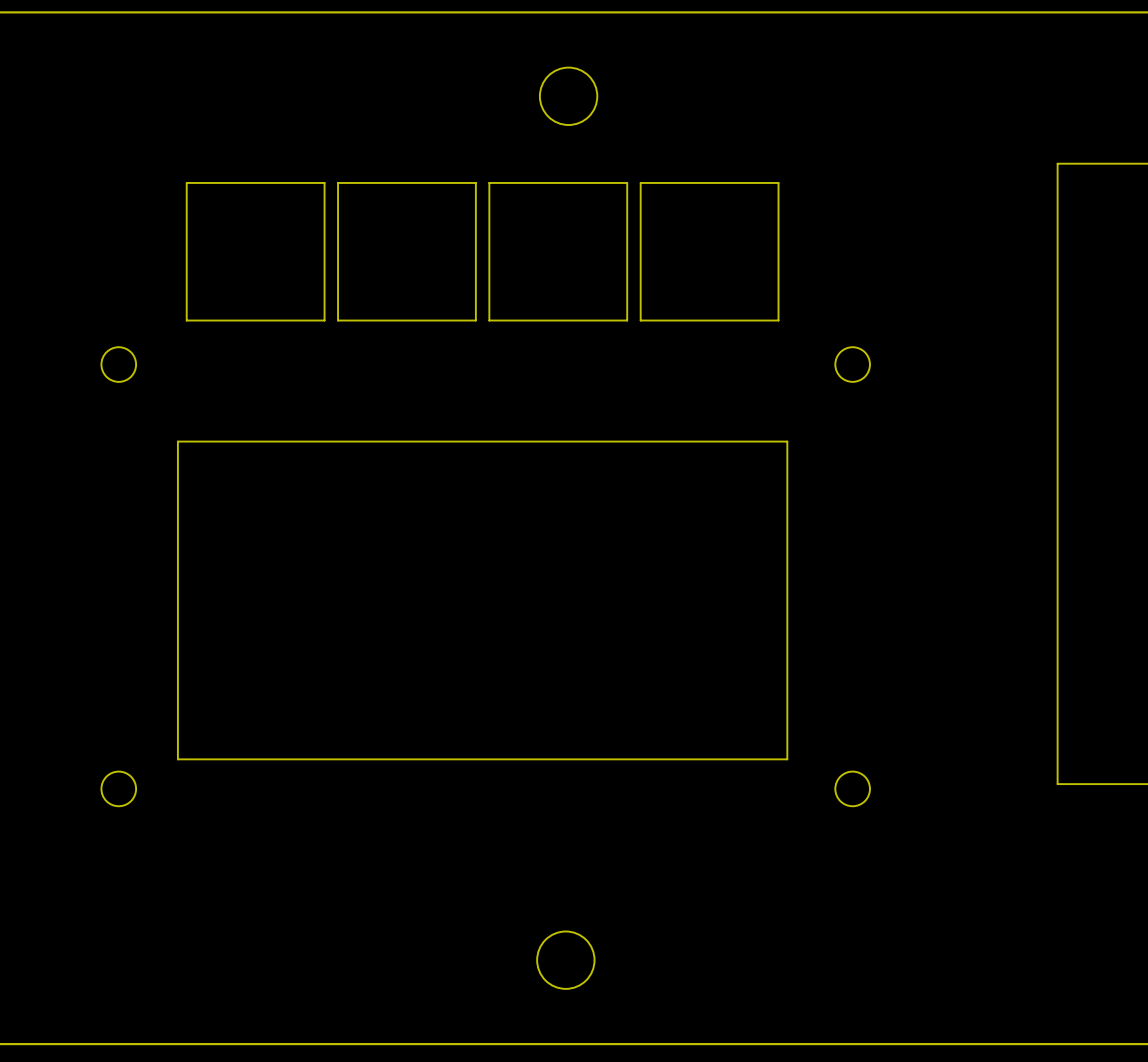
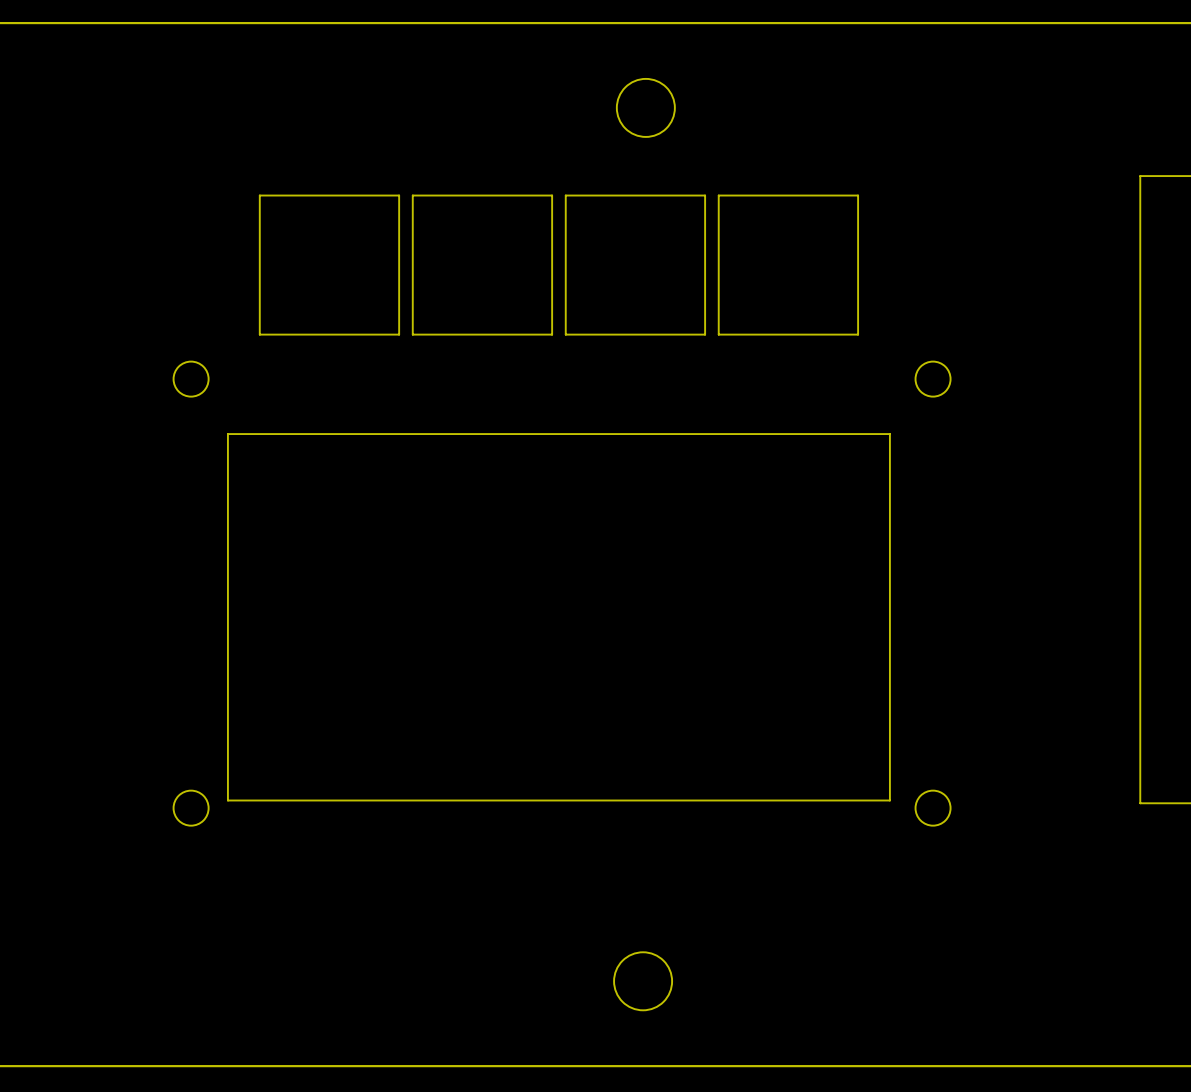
board edge: (787, 441) (177, 441) (177, 759) (787, 759) (787, 441) -> (889, 434) (889, 800) (227, 800) (227, 434) (889, 434)

